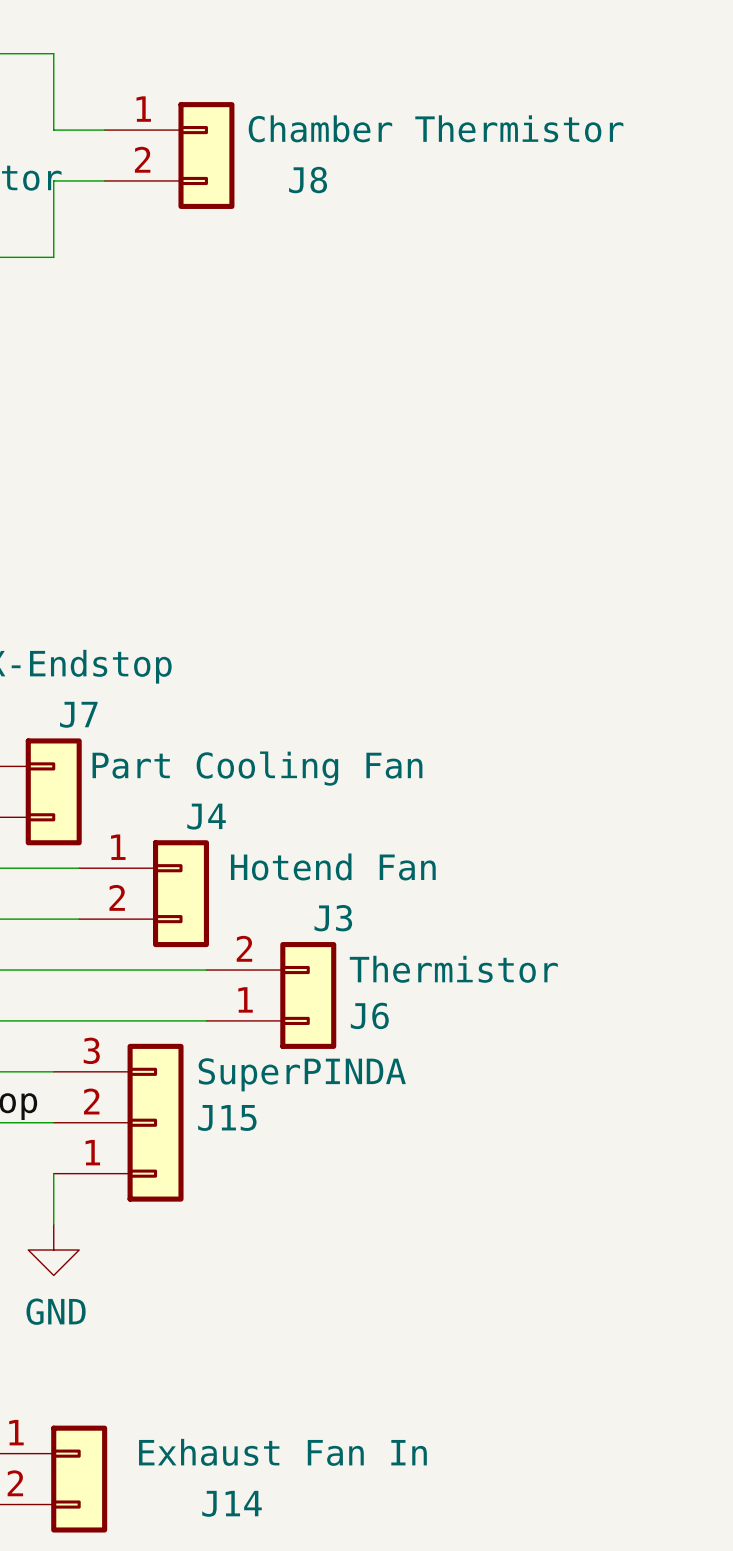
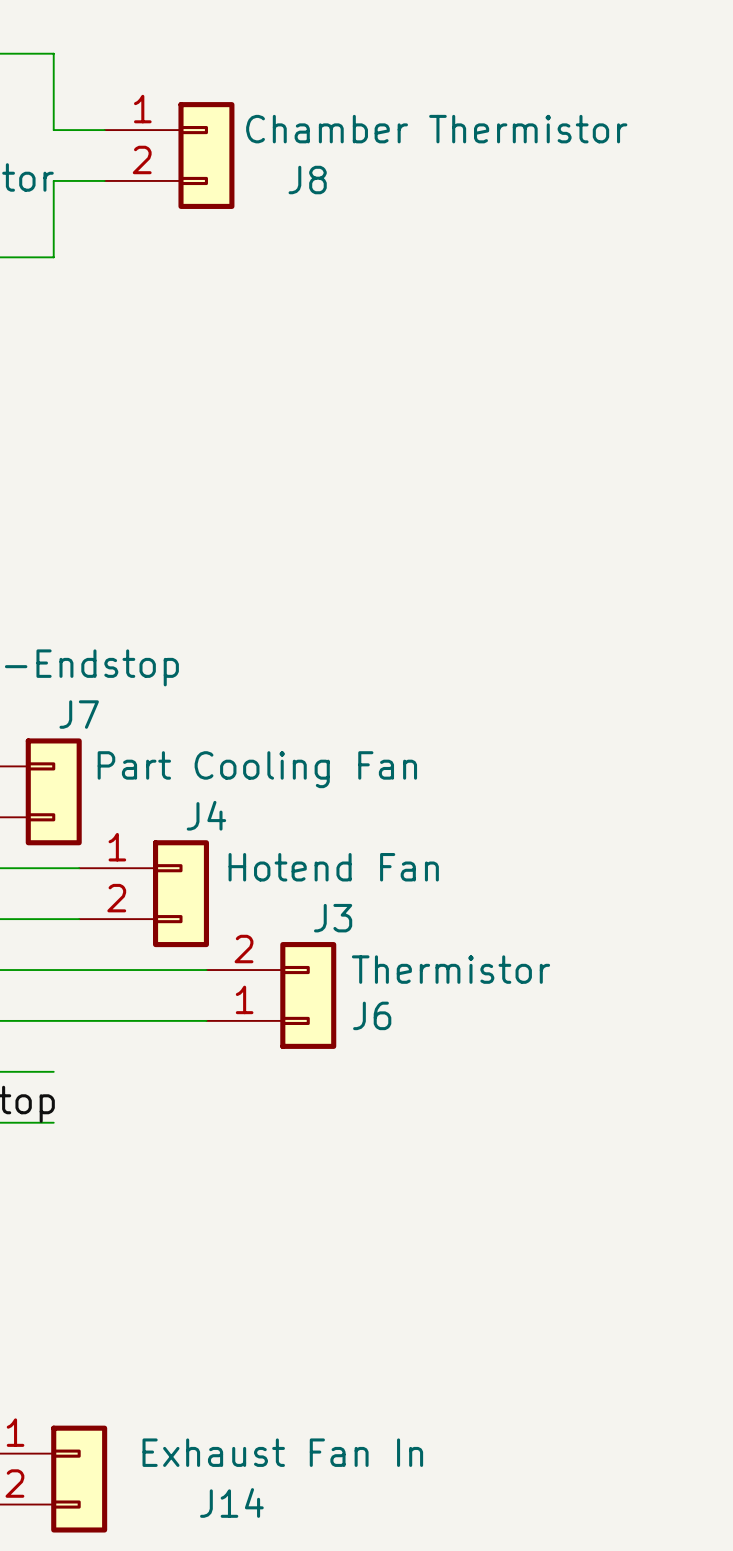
J15: SuperPINDA (118, 1122) -> none
wire: (53, 1173) (53, 1224) -> none
power symbol: GND (53, 1250) -> none

